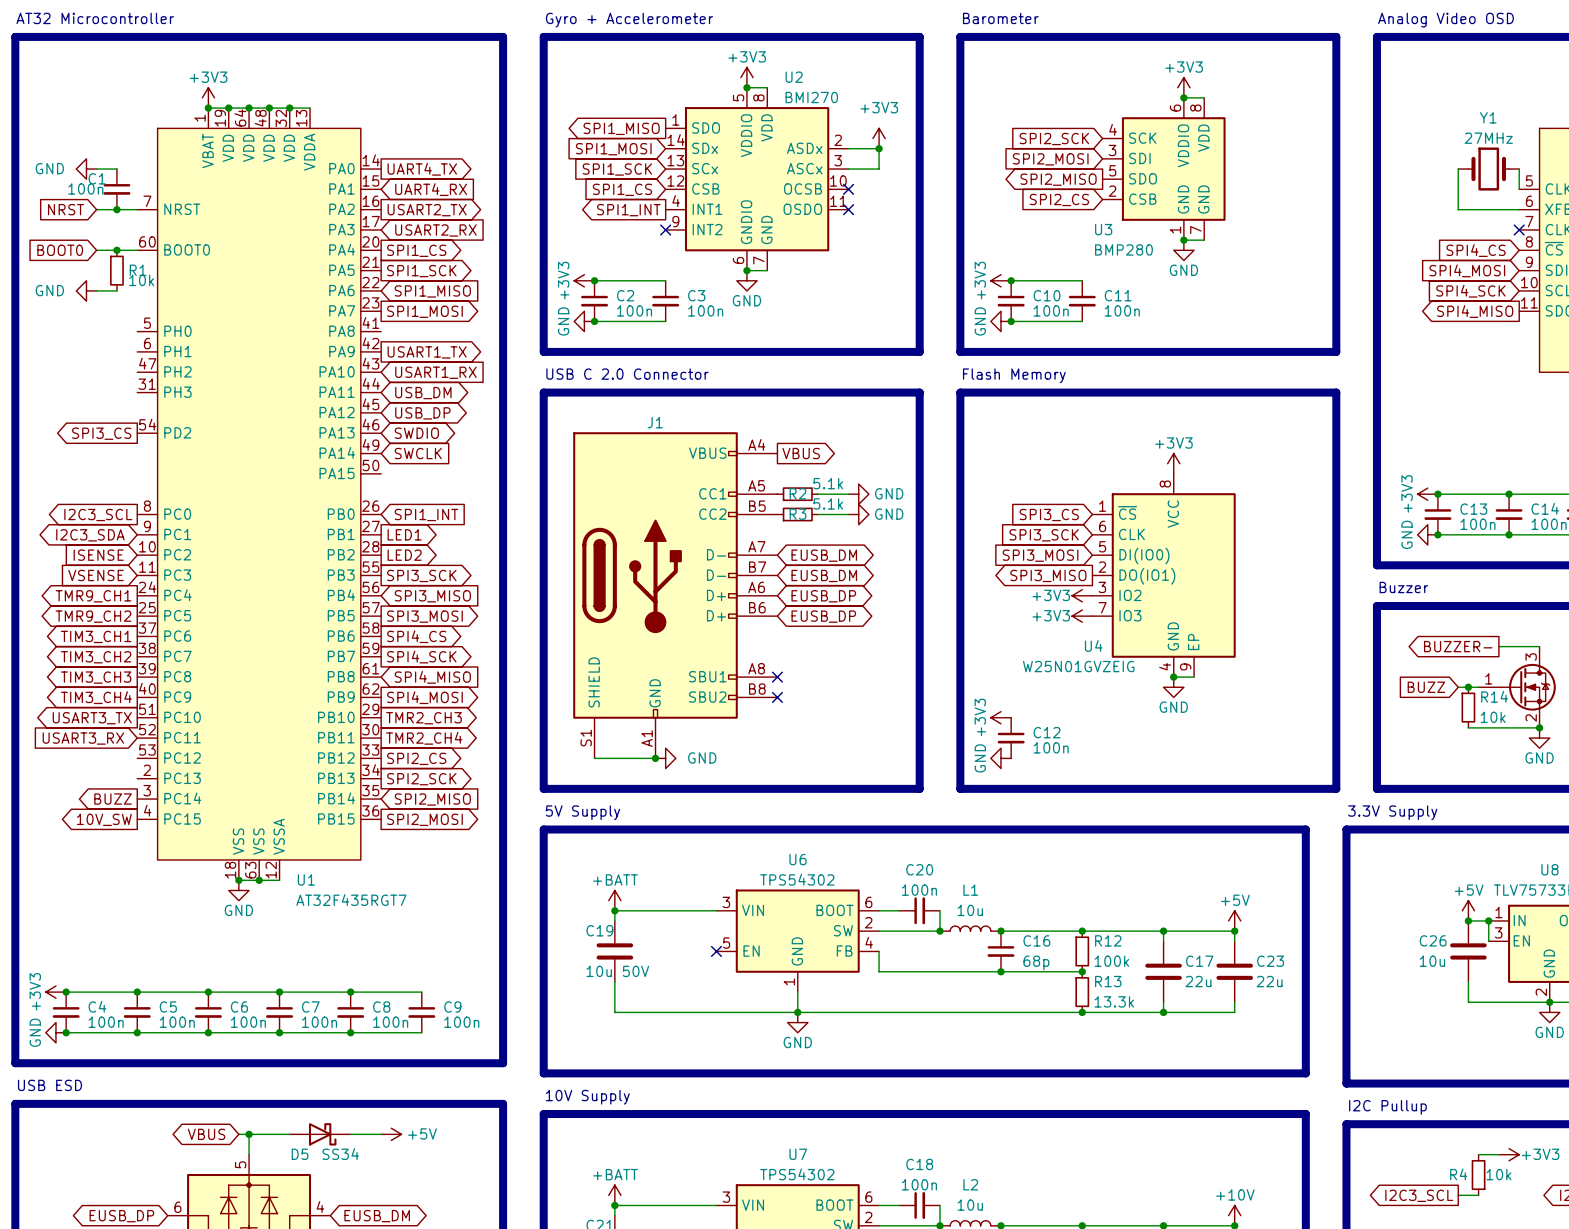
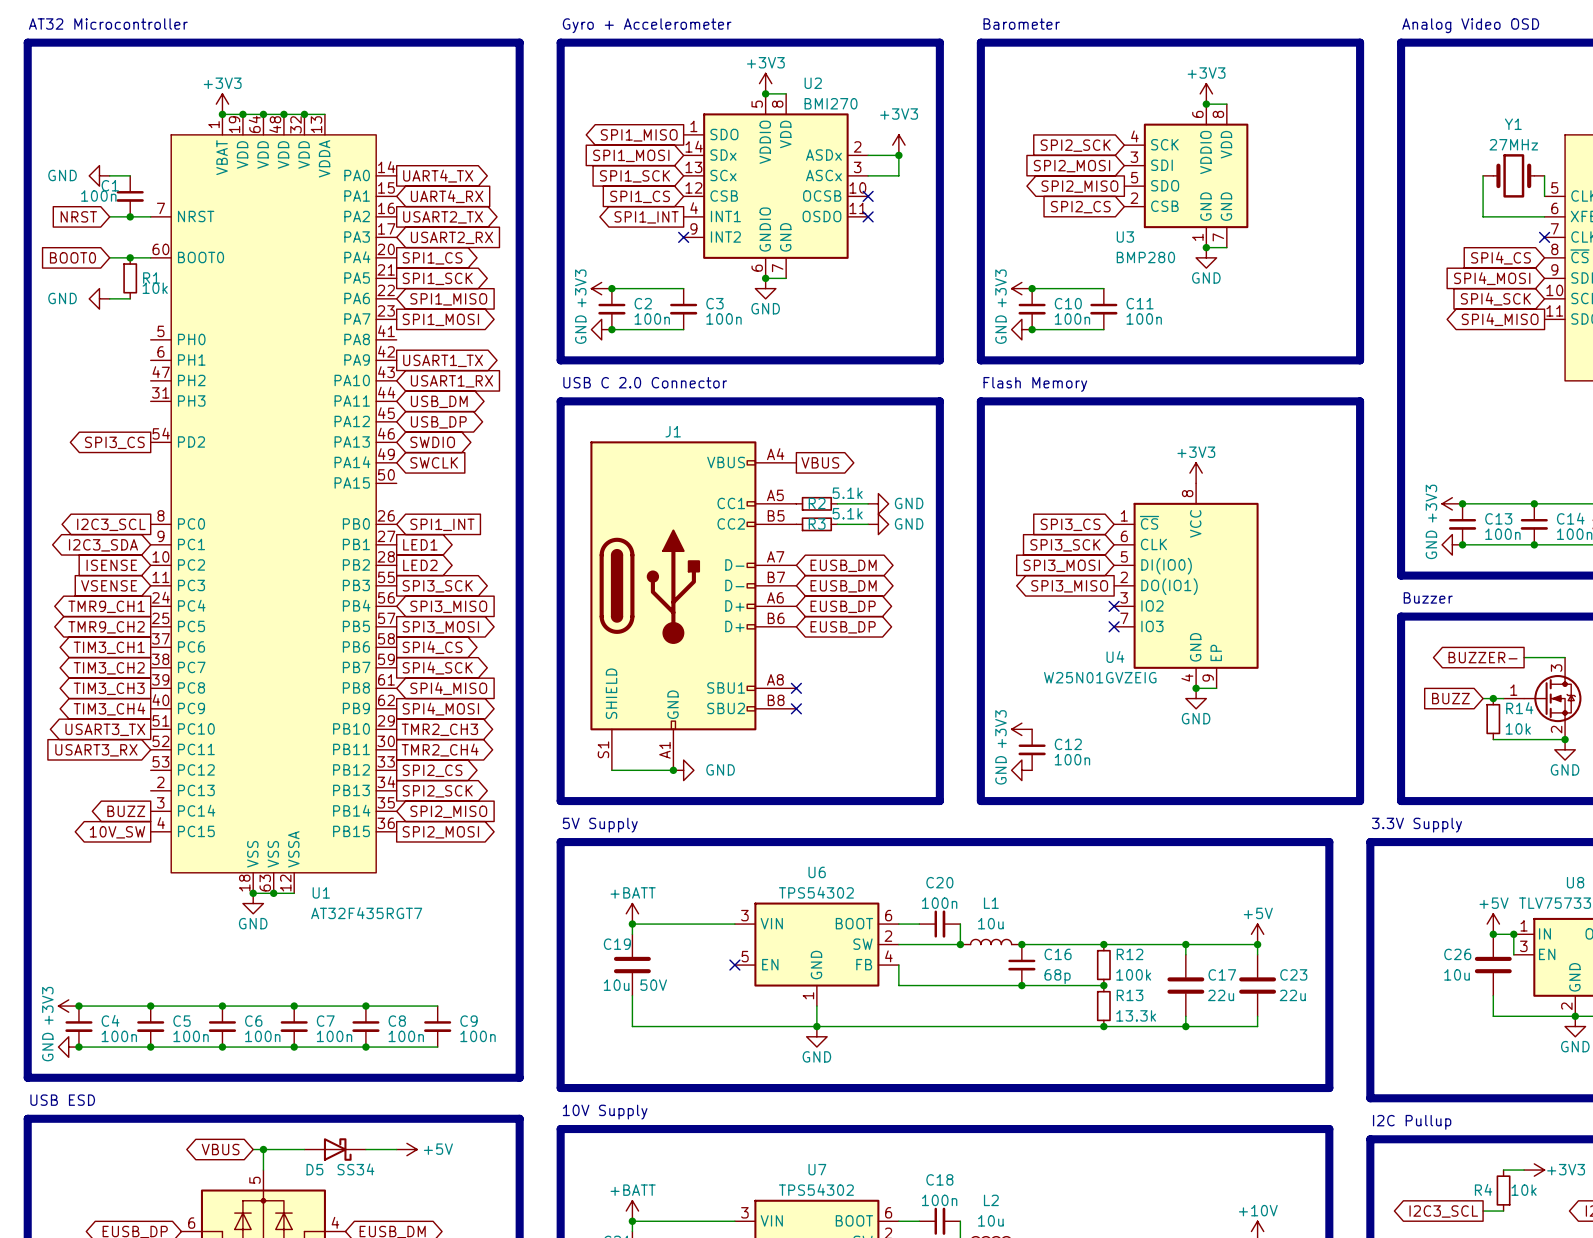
power symbol: +3V3 (1082, 595) -> none
no-connect mark: none -> (1114, 606)
power symbol: +3V3 (1082, 616) -> none
no-connect mark: none -> (1114, 626)

